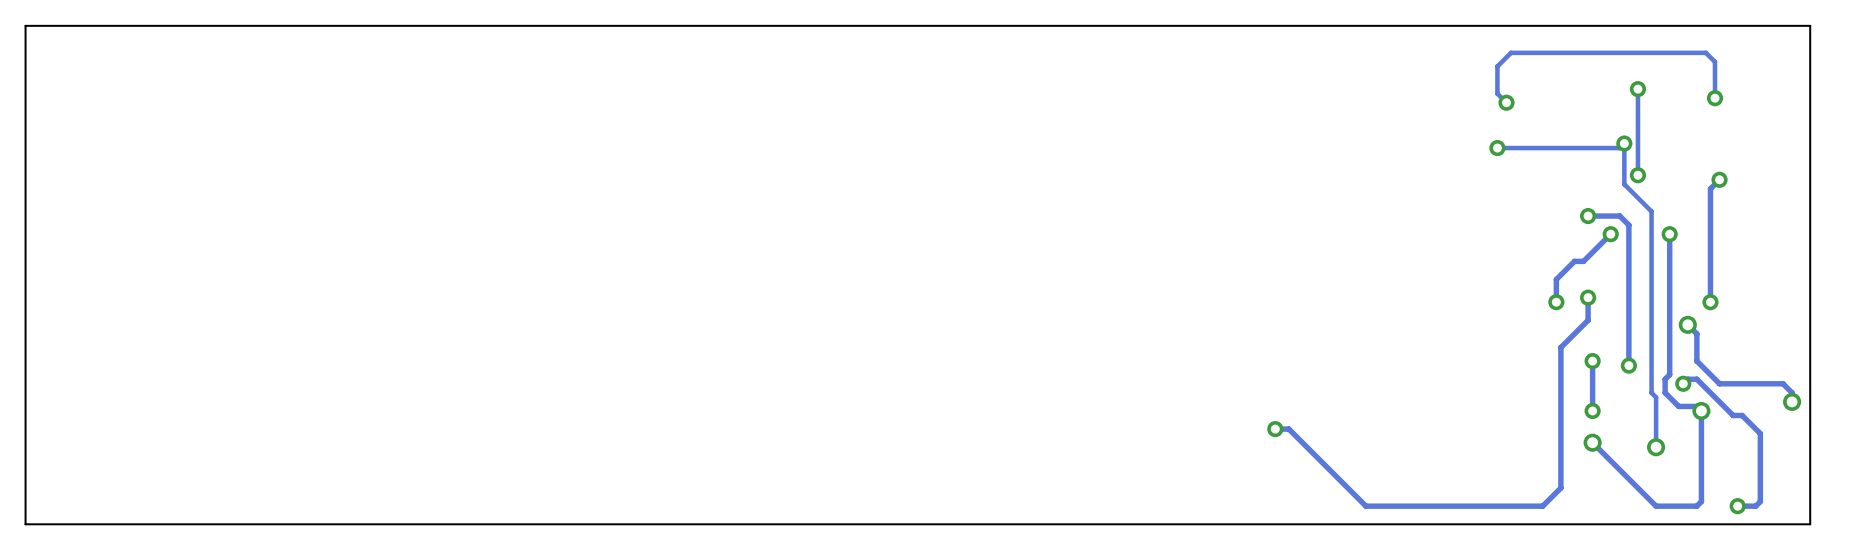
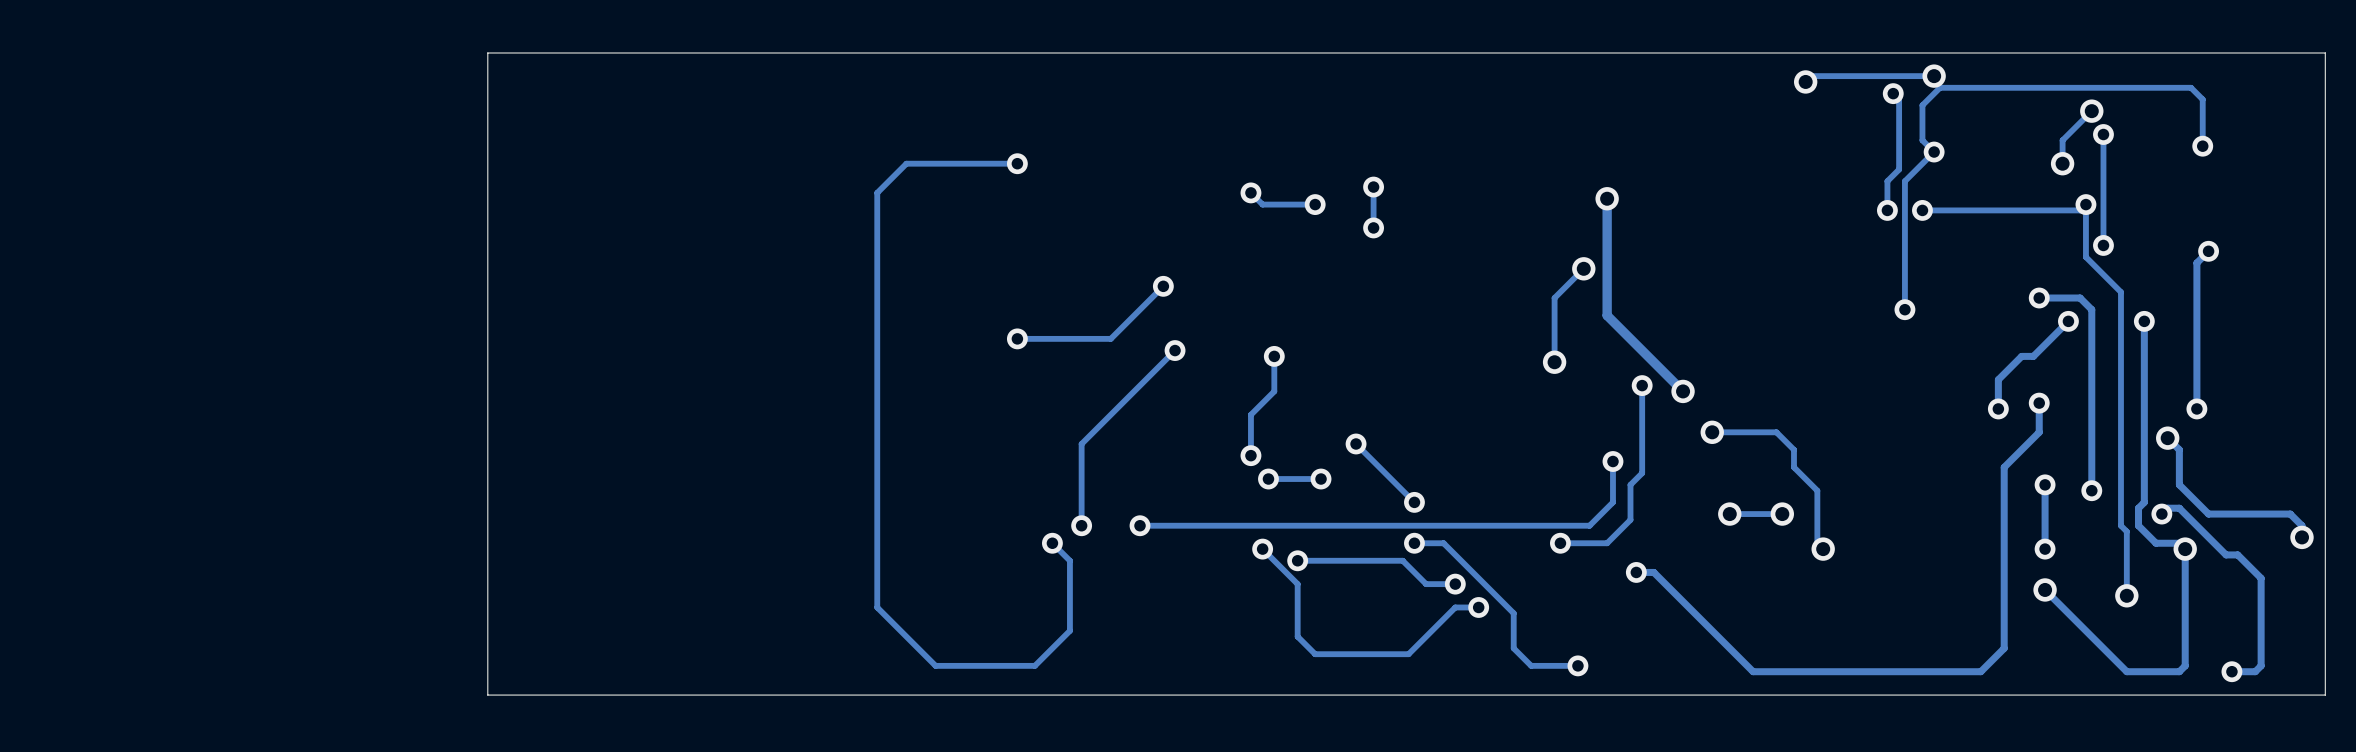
board edge: (383, 25) (25, 25) (25, 524) (383, 524) -> (487, 52) (487, 695)
track: none -> (1934, 76) (1811, 76) (1805, 81)
via: none -> (1934, 76)
via: none -> (1805, 81)
track: none -> (1893, 93) (1899, 99) (1899, 169) (1887, 181) (1887, 210)
via: none -> (1893, 93)
track: none -> (2091, 111) (2062, 140) (2062, 163)
via: none -> (2091, 111)
track: none -> (1934, 152) (1904, 181) (1904, 309)
track: none -> (1017, 163) (906, 163) (877, 192) (877, 607) (935, 665) (1034, 665) (1069, 630) (1069, 560) (1052, 543)
via: none -> (1017, 163)
via: none -> (2062, 163)
track: none -> (1373, 187) (1373, 227)
via: none -> (1373, 187)
track: none -> (1250, 192) (1262, 204) (1315, 204)
via: none -> (1250, 192)
track: none -> (1607, 198) (1607, 315) (1683, 391)
via: none -> (1607, 198)
via: none -> (1315, 204)
via: none -> (1887, 210)
via: none -> (1373, 227)
track: none -> (1583, 268) (1554, 298) (1554, 362)
via: none -> (1583, 268)
track: none -> (1163, 286) (1110, 338) (1017, 338)
via: none -> (1163, 286)
via: none -> (1904, 309)
via: none -> (1017, 338)
track: none -> (1175, 350) (1081, 443) (1081, 525)
via: none -> (1175, 350)
track: none -> (1274, 356) (1274, 391) (1250, 414) (1250, 455)
via: none -> (1274, 356)
via: none -> (1554, 362)
track: none -> (1642, 385) (1642, 473) (1630, 484) (1630, 519) (1607, 543) (1560, 543)
via: none -> (1642, 385)
via: none -> (1683, 391)
track: none -> (1712, 432) (1776, 432) (1793, 449) (1793, 467) (1817, 490) (1817, 543) (1823, 549)
via: none -> (1712, 432)
track: none -> (1356, 443) (1414, 502)
via: none -> (1356, 443)
via: none -> (1250, 455)
track: none -> (1612, 461) (1612, 502) (1589, 525) (1140, 525)
via: none -> (1612, 461)
via: none -> (1268, 479)
track: none -> (1321, 479) (1268, 479)
via: none -> (1321, 479)
via: none -> (1414, 502)
via: none -> (1729, 514)
track: none -> (1782, 514) (1729, 514)
via: none -> (1782, 514)
via: none -> (1081, 525)
via: none -> (1140, 525)
via: none -> (1052, 543)
track: none -> (1414, 543) (1443, 543) (1513, 613) (1513, 648) (1531, 665) (1577, 665)
via: none -> (1414, 543)
via: none -> (1560, 543)
track: none -> (1262, 549) (1297, 584) (1297, 636) (1315, 654) (1408, 654) (1455, 607) (1478, 607)
via: none -> (1262, 549)
via: none -> (1823, 549)
track: none -> (1297, 560) (1402, 560) (1426, 584) (1455, 584)
via: none -> (1297, 560)
via: none -> (1455, 584)
via: none -> (1478, 607)
via: none -> (1577, 665)

